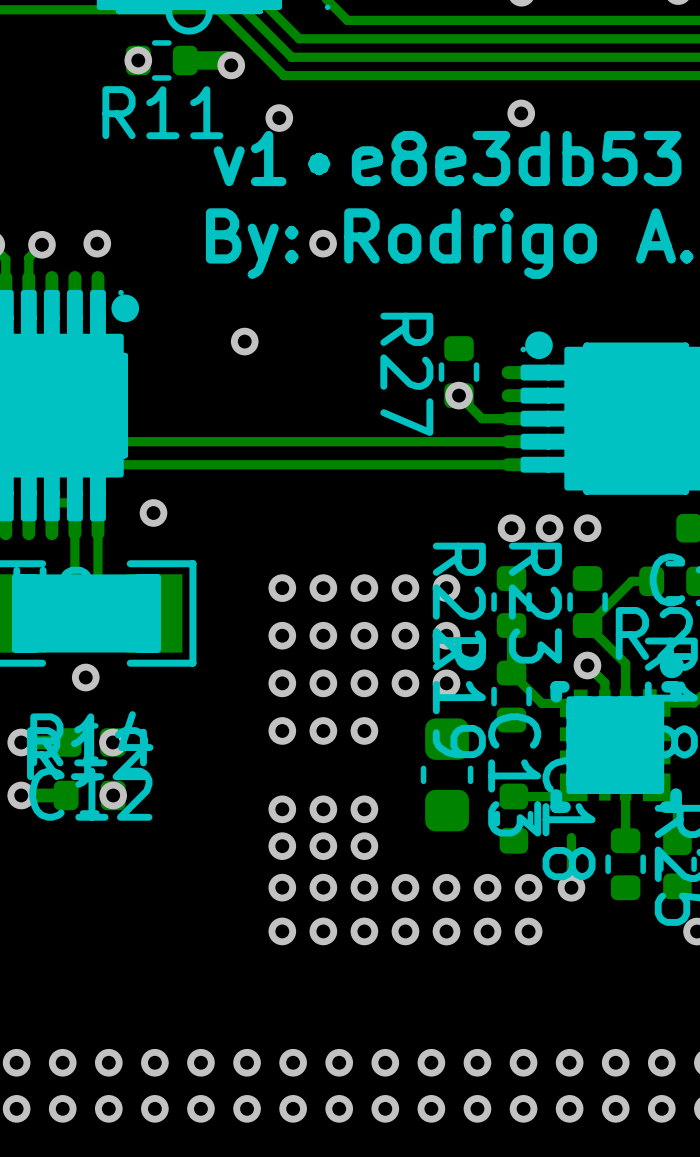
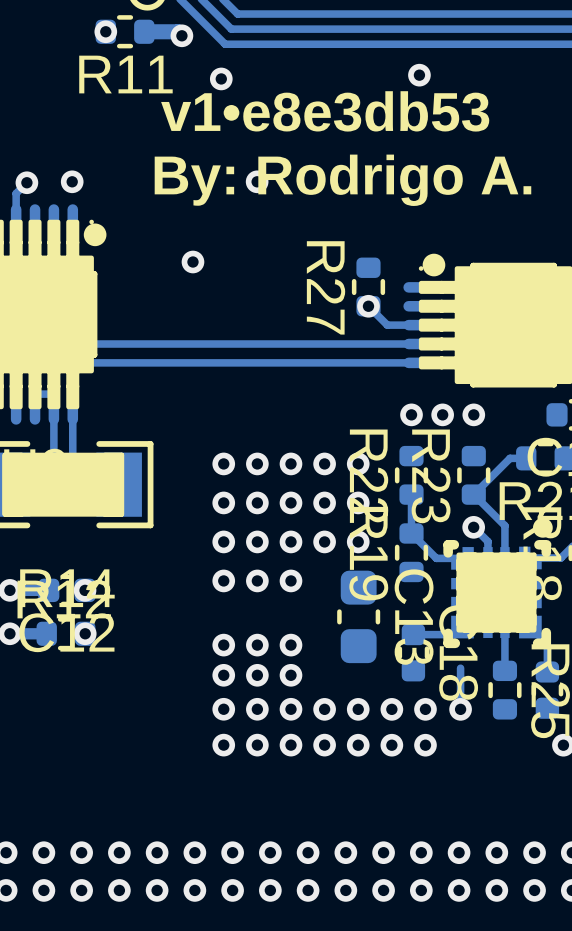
via: (153, 512) -> none
via: (85, 677) -> none

